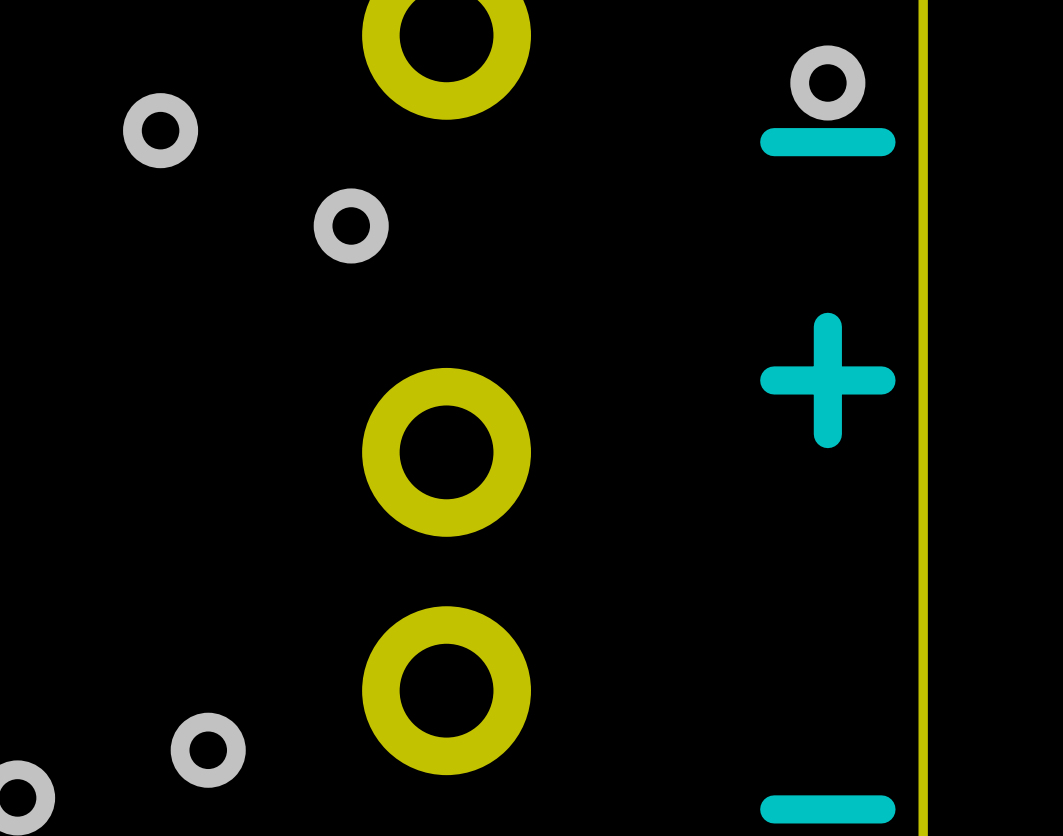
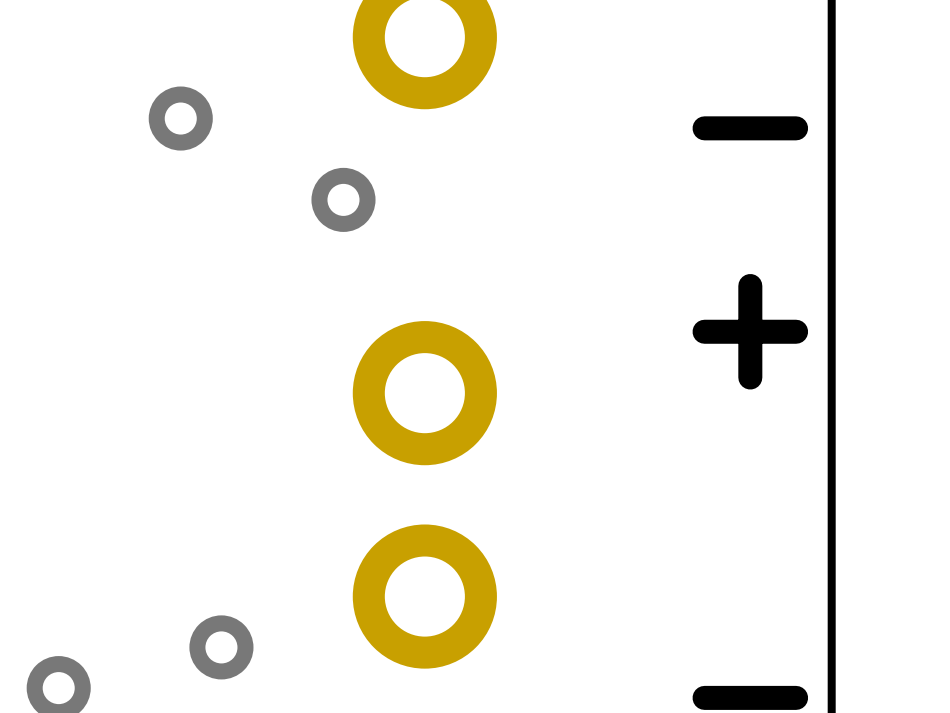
via: (827, 82) -> none

